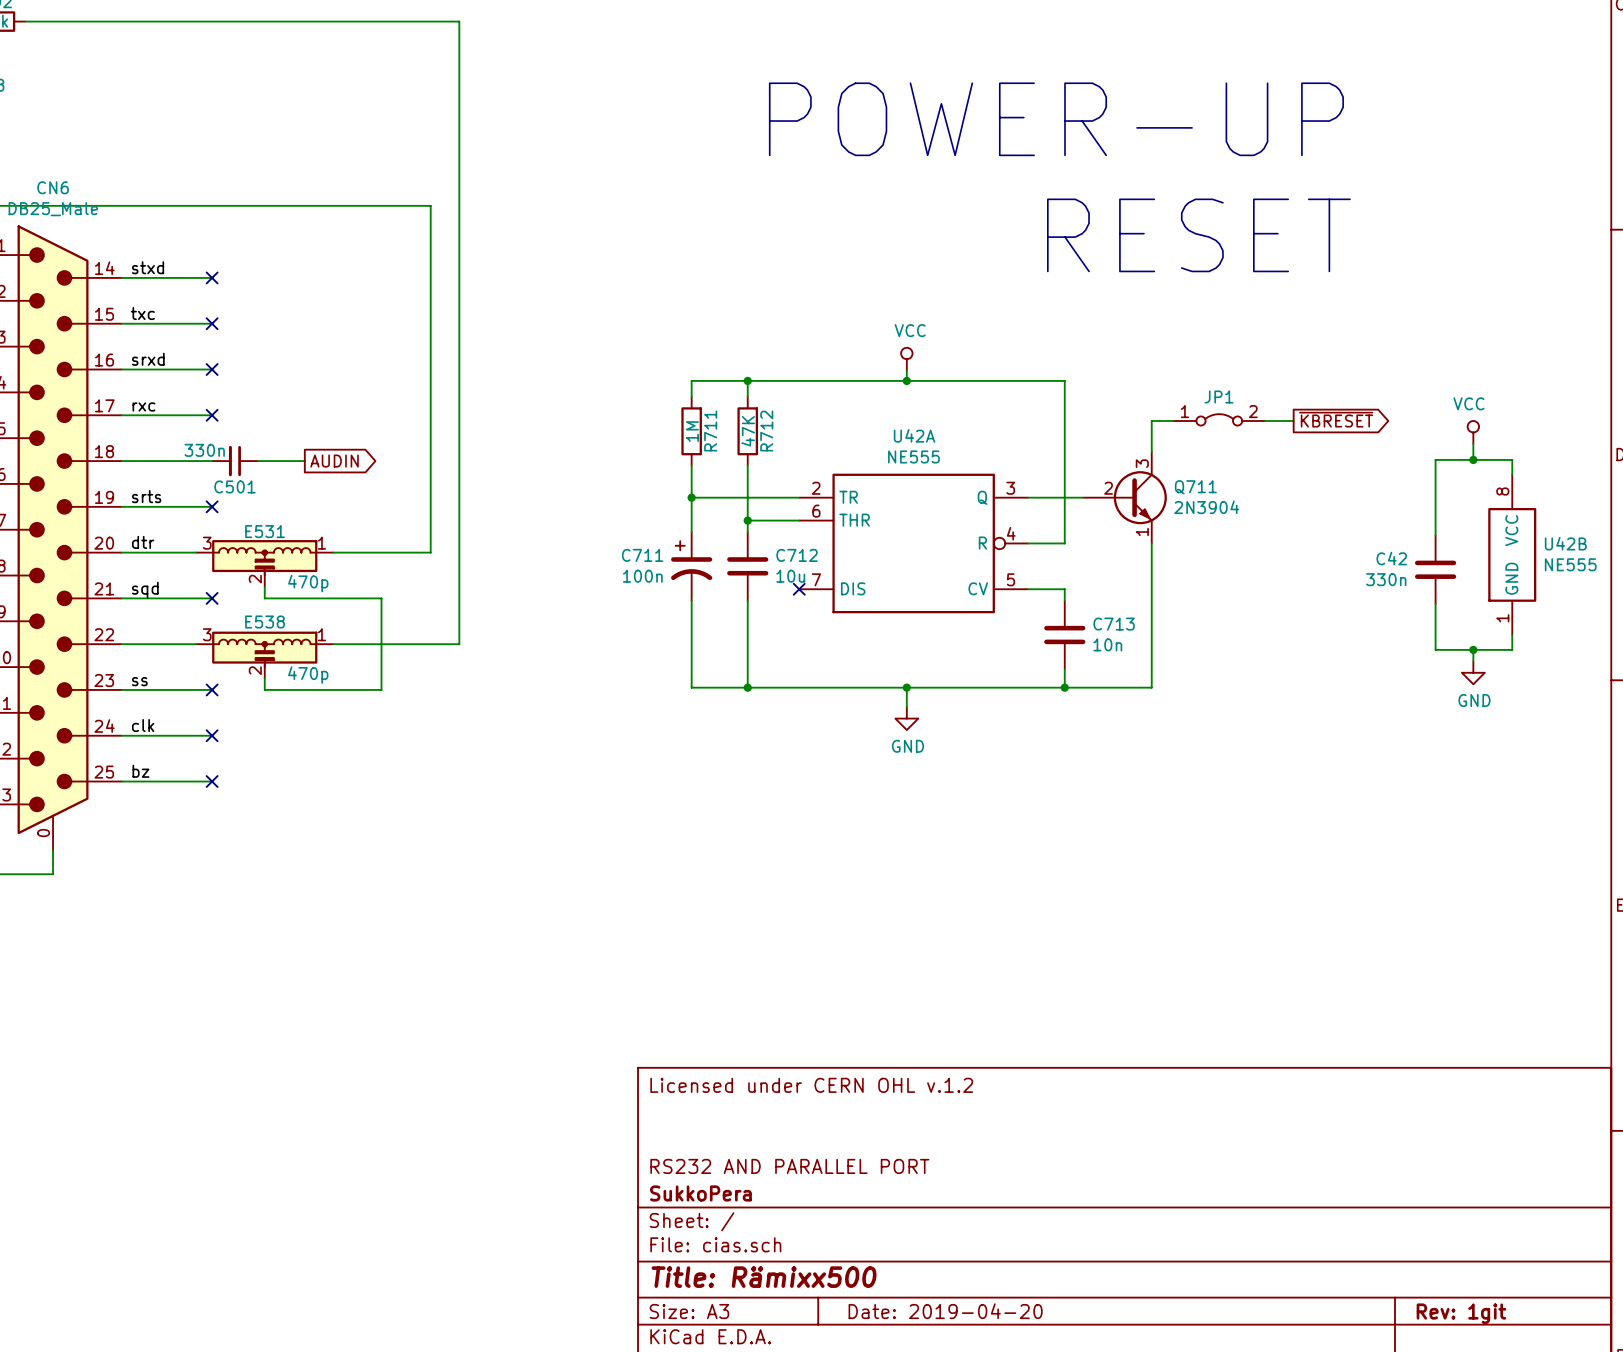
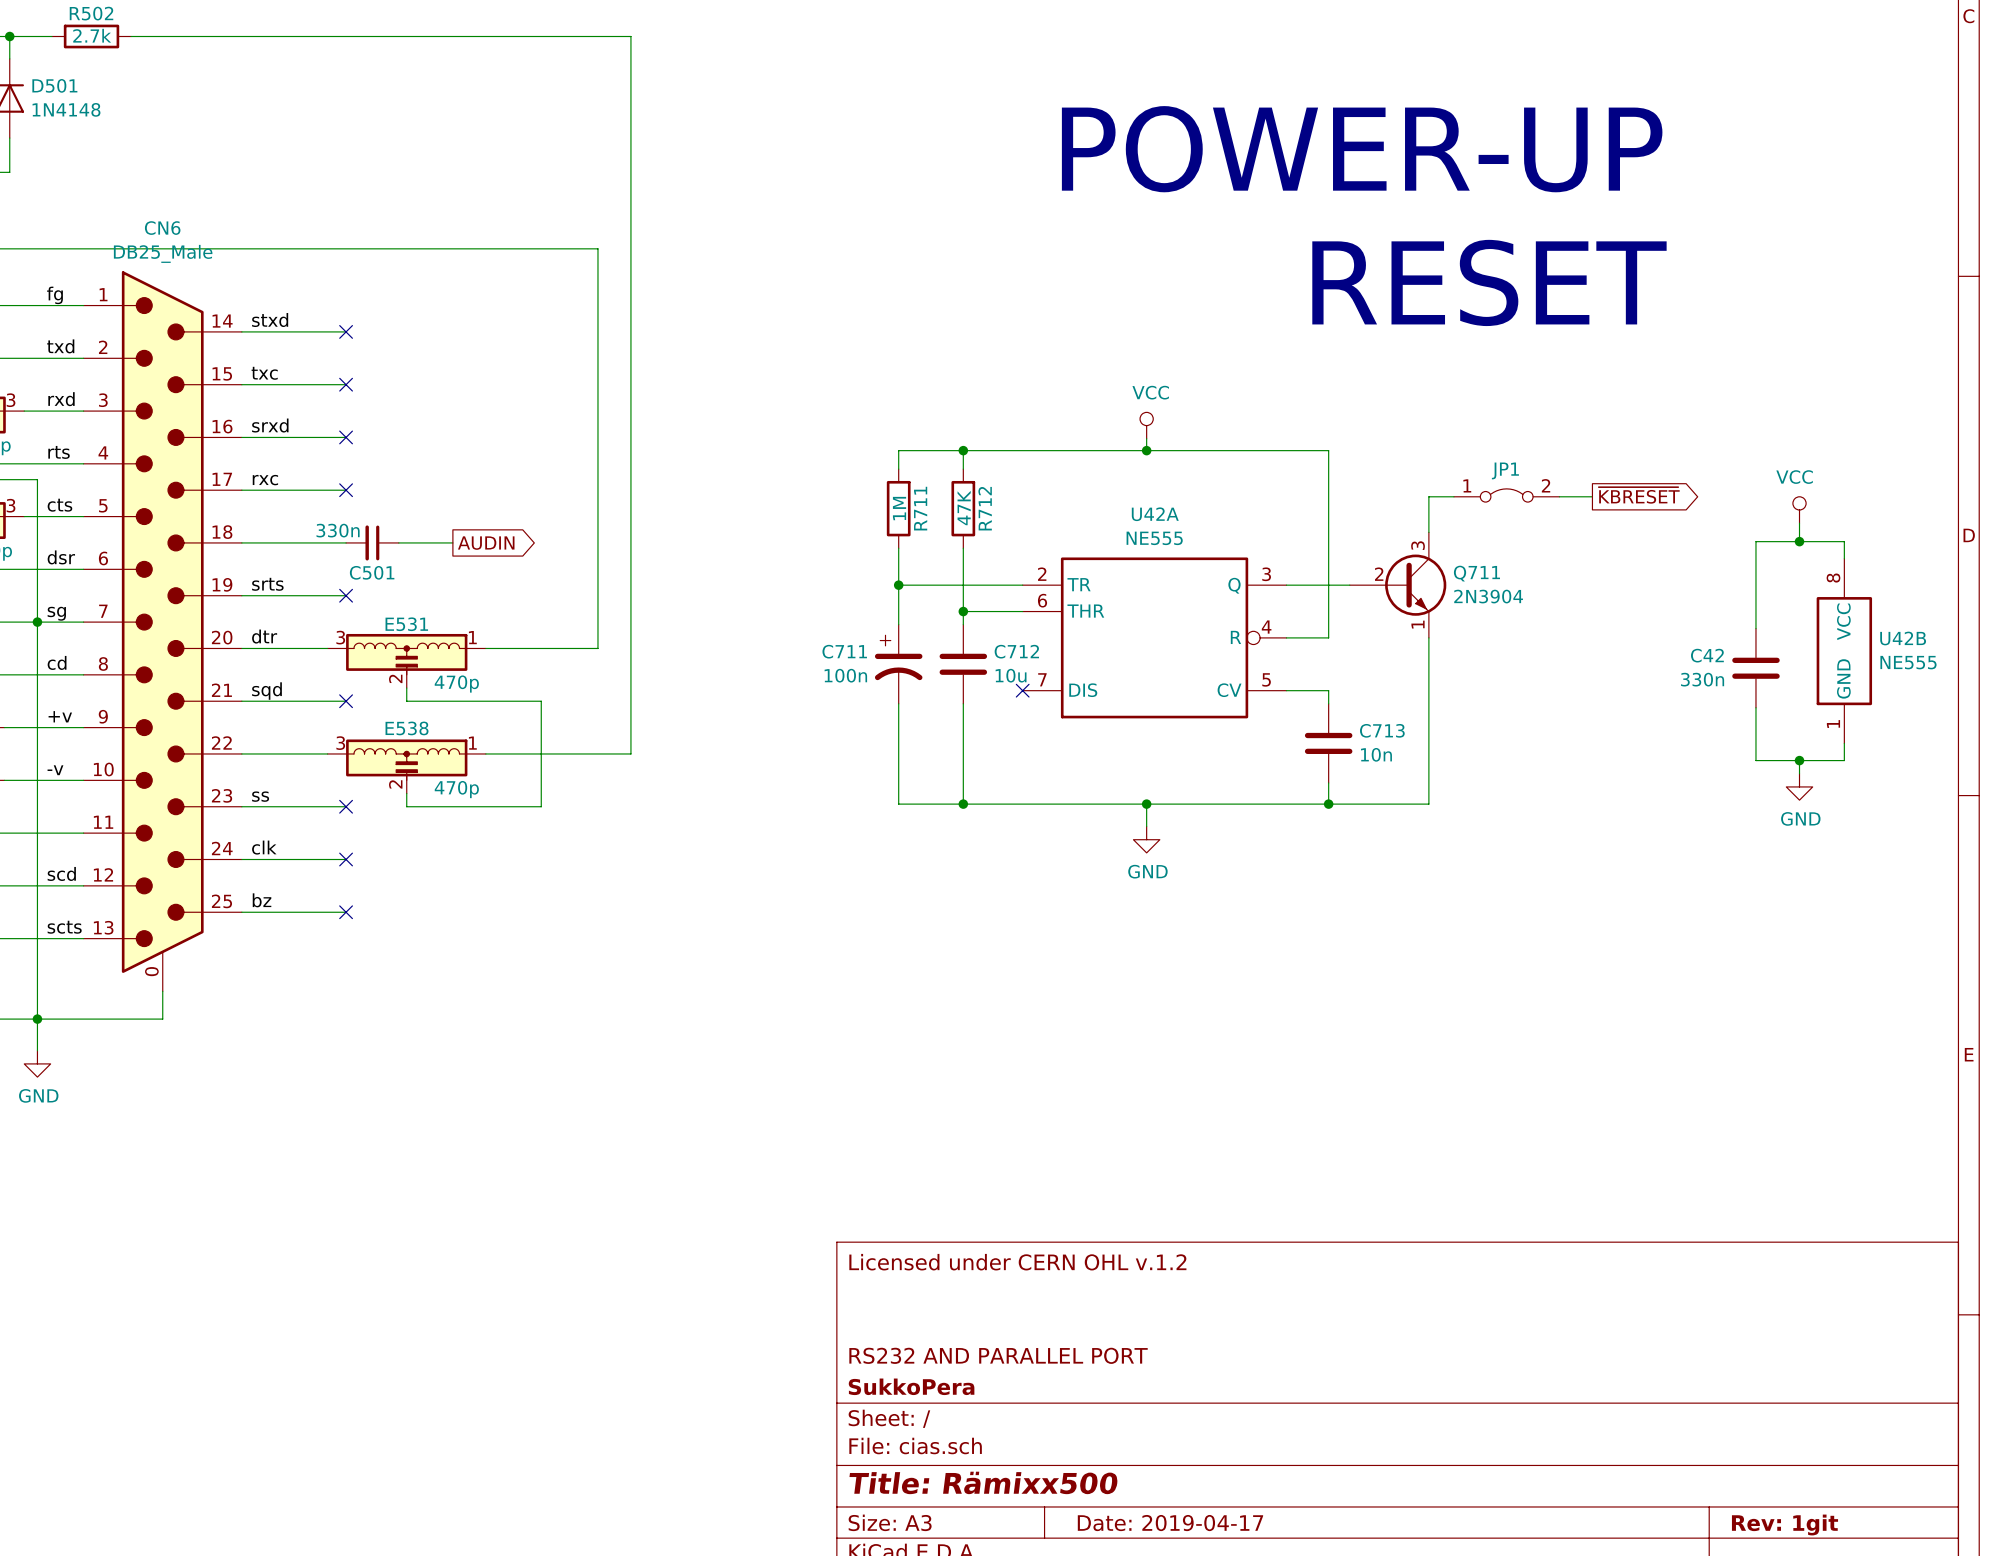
title block: Date: 2019-04-20 (945, 1311) -> Date: 2019-04-17 (1170, 1523)

